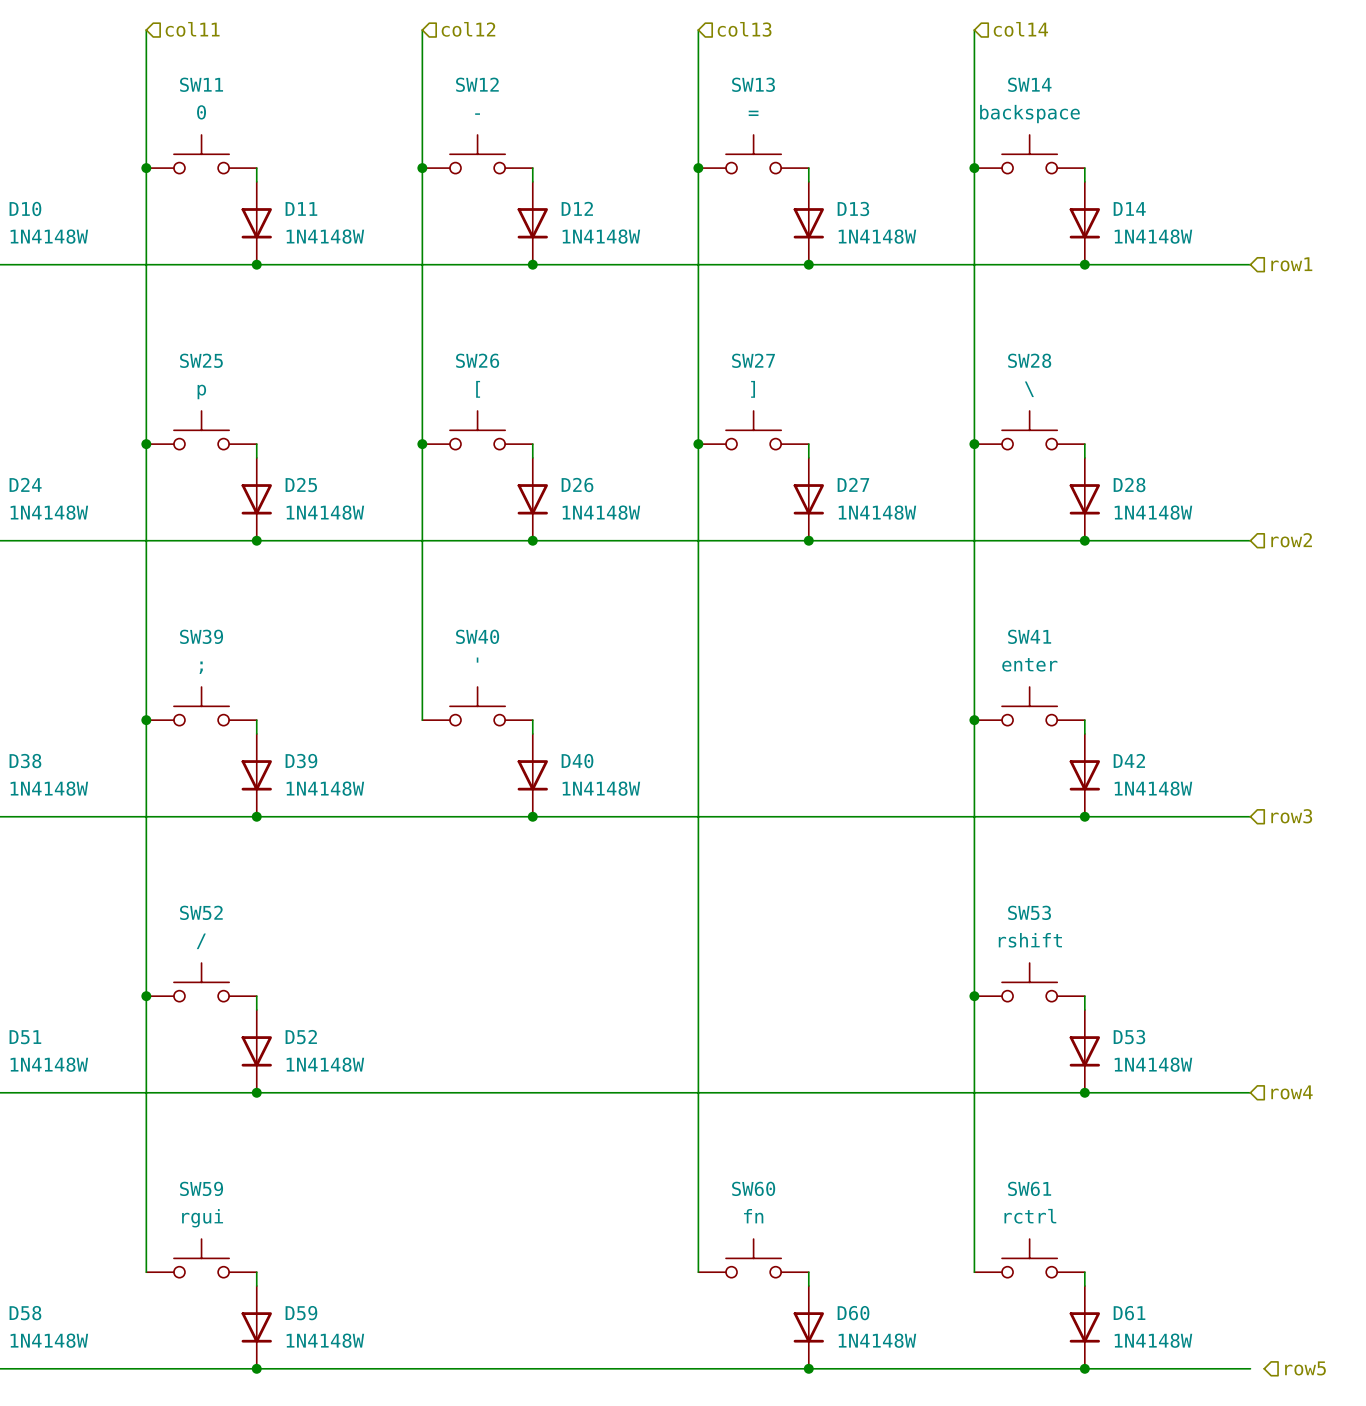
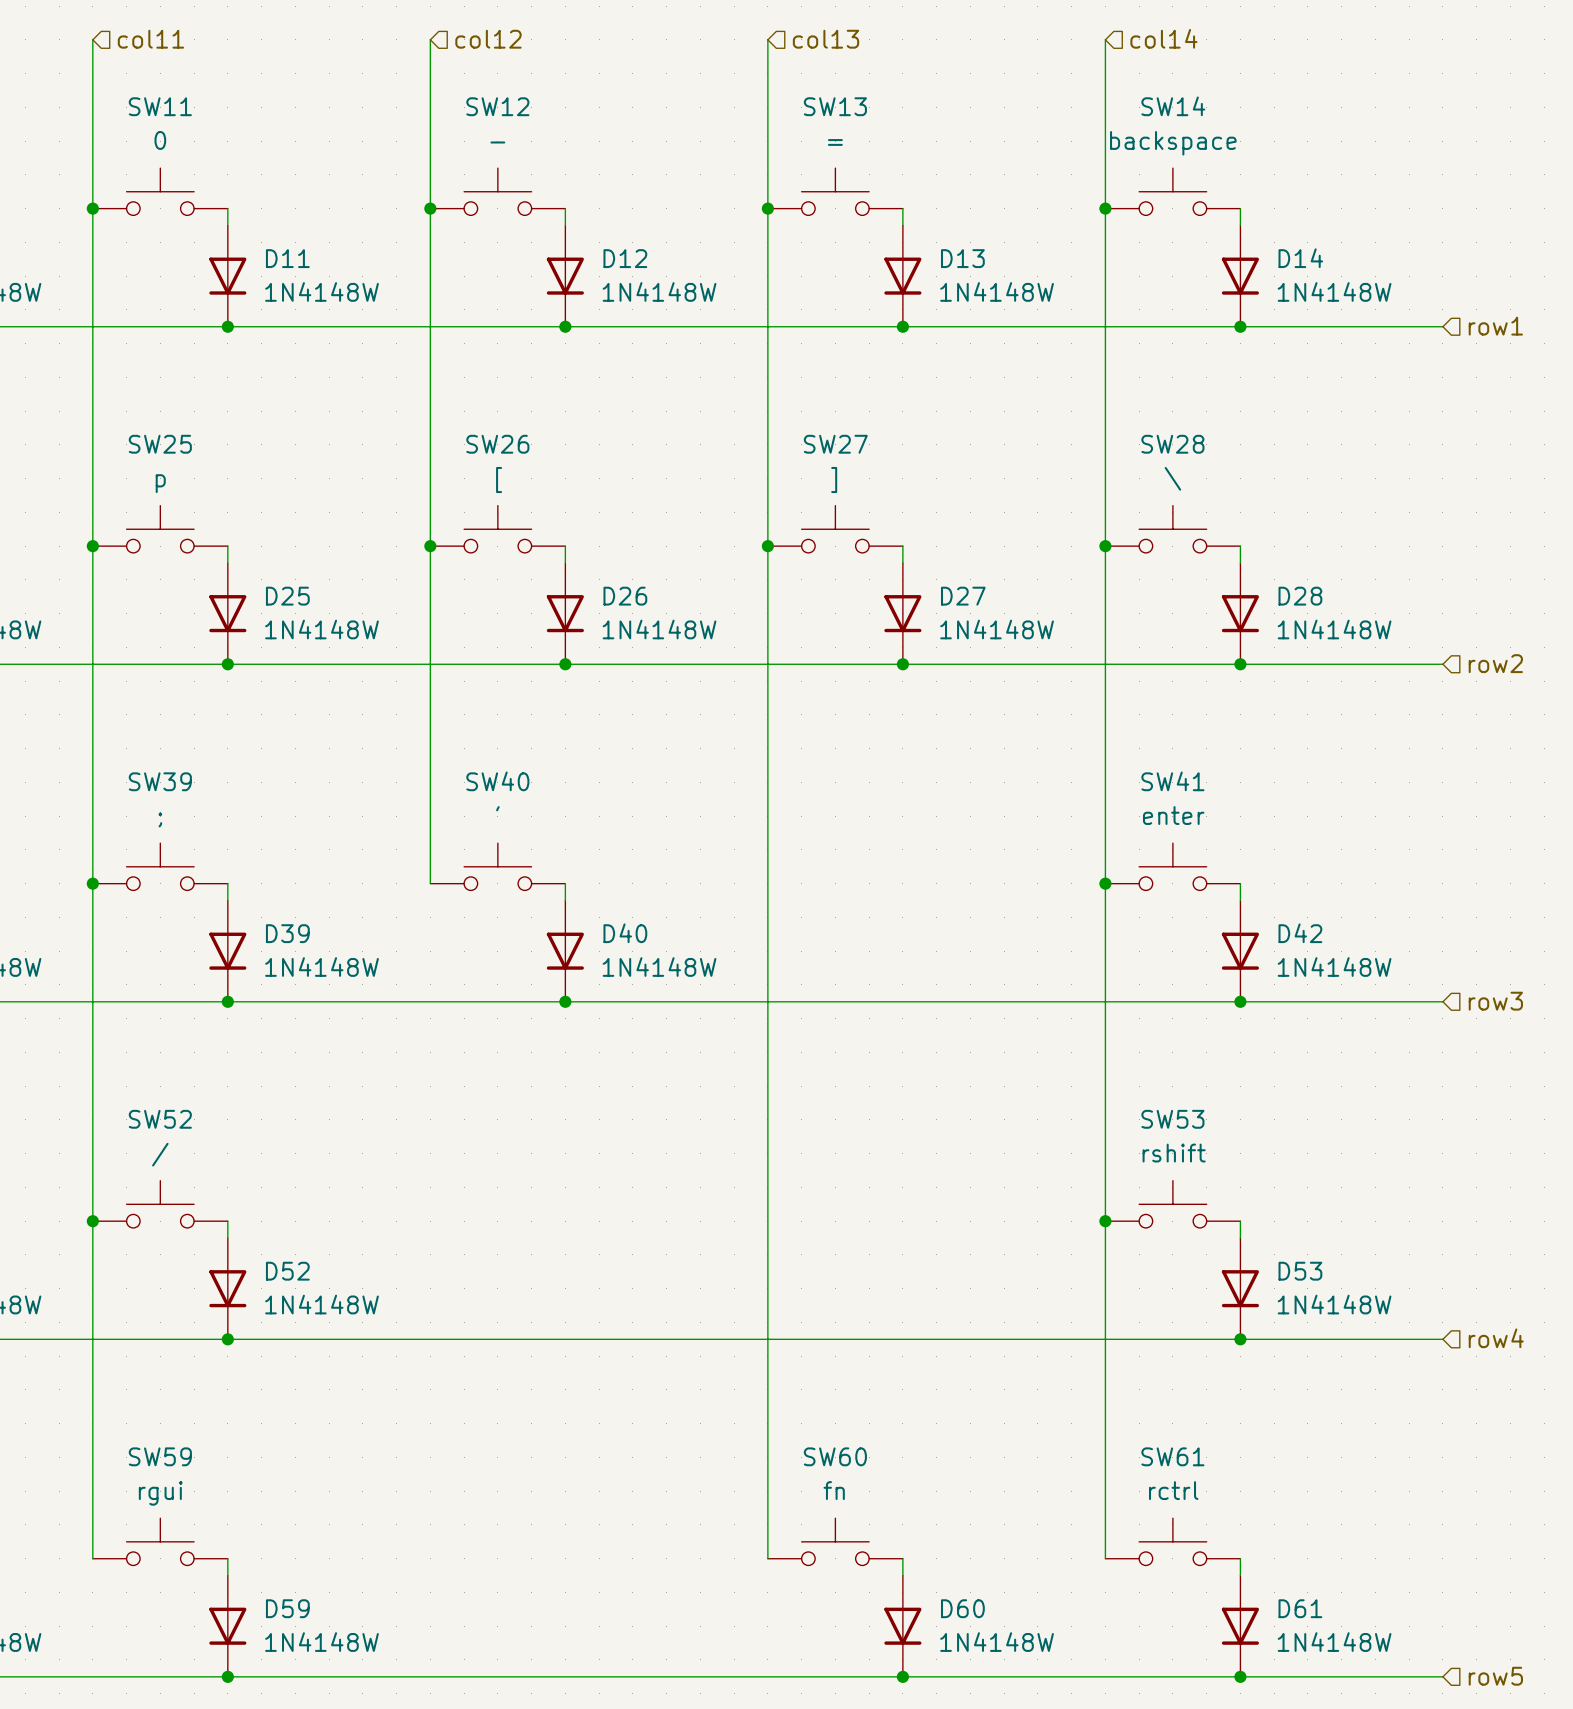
hierarchical label position: row5 (1305, 1368) -> row5 (1495, 1676)

